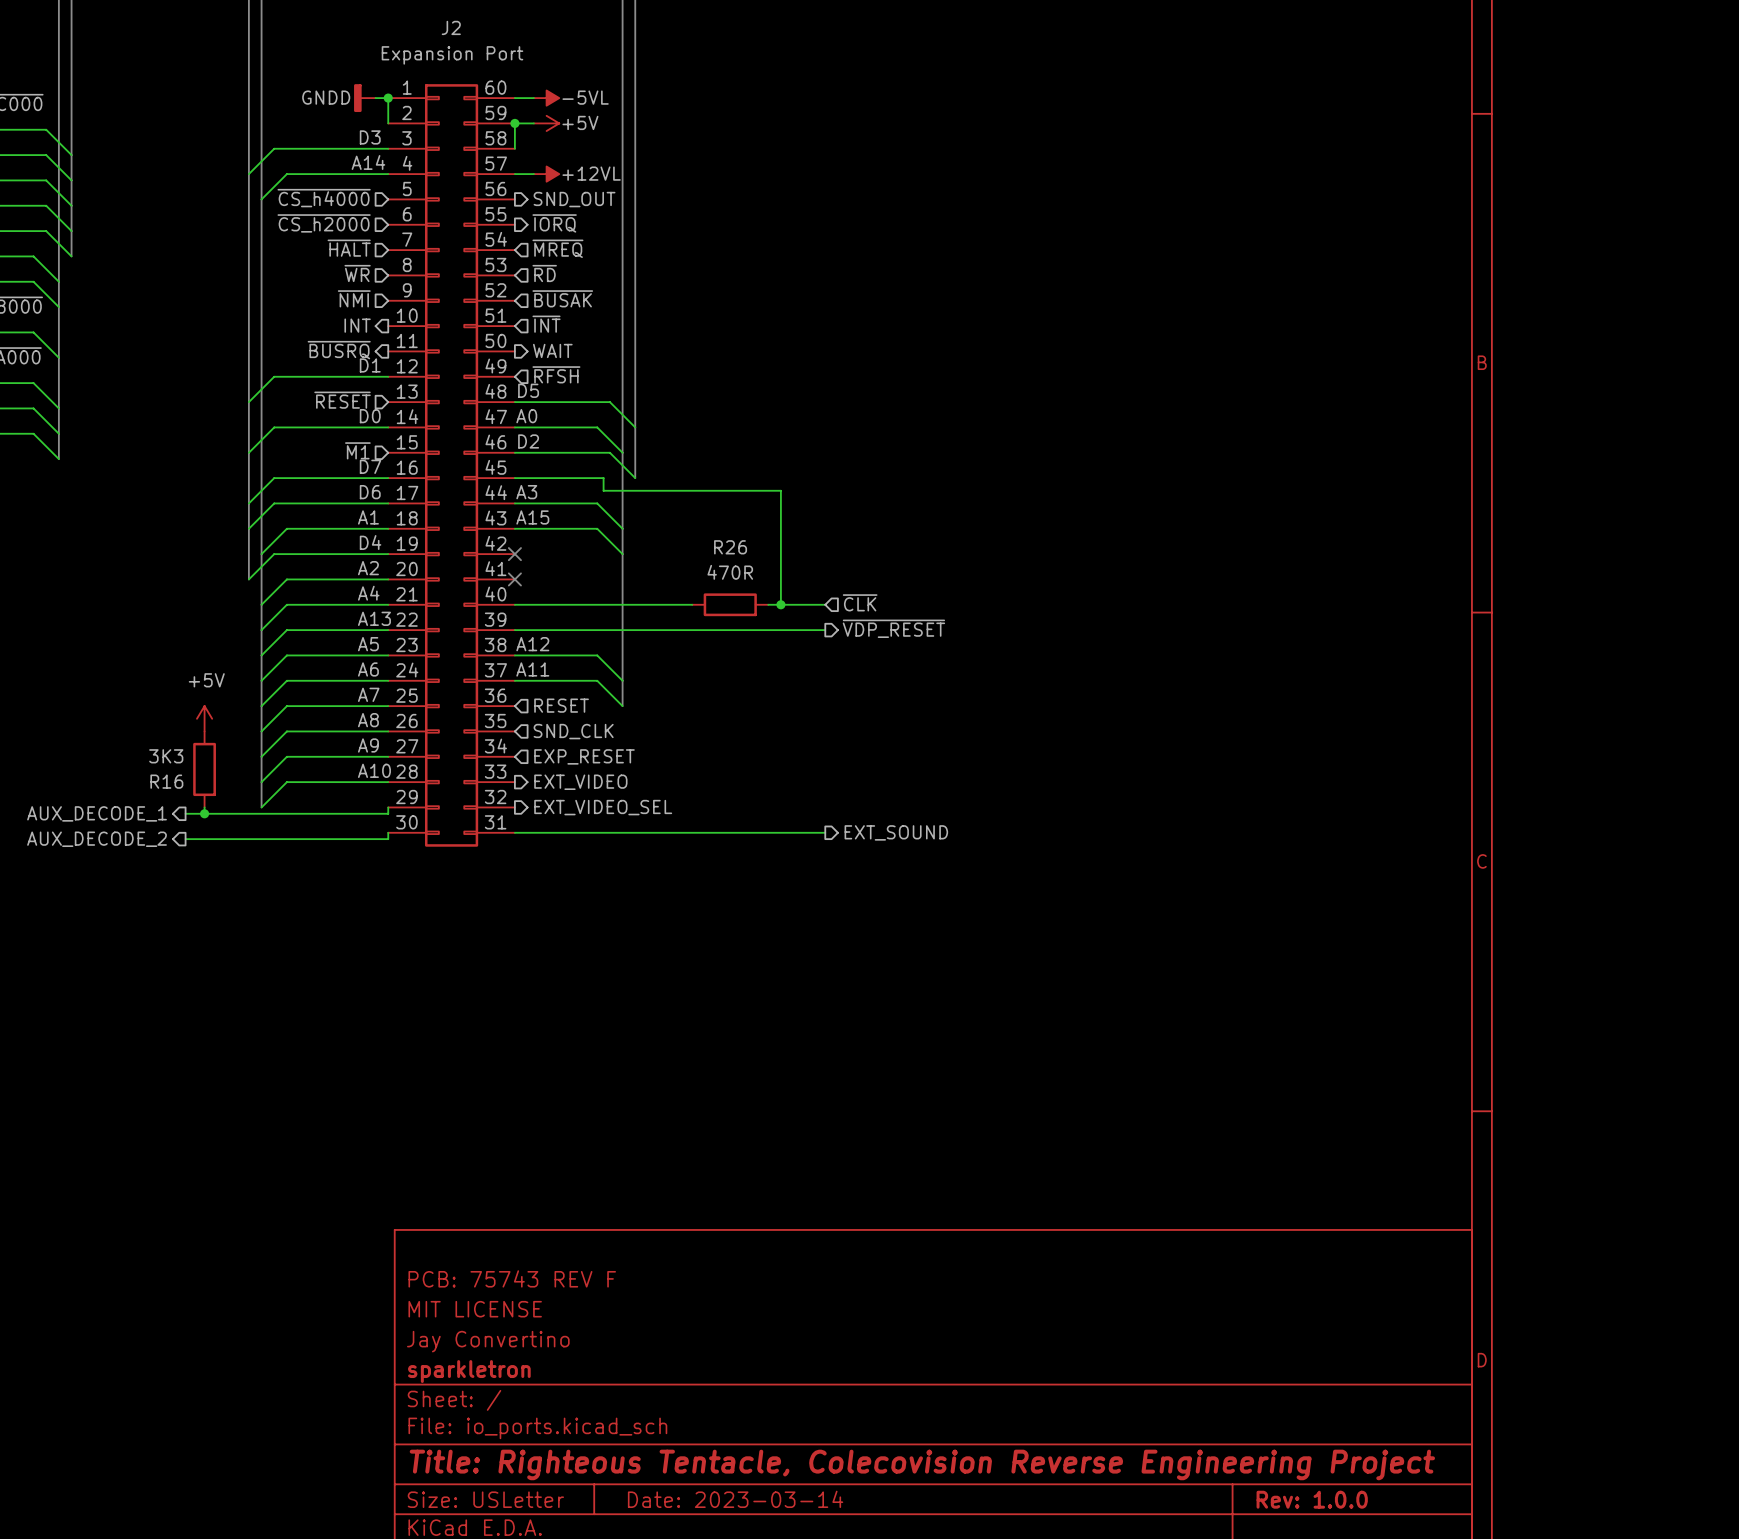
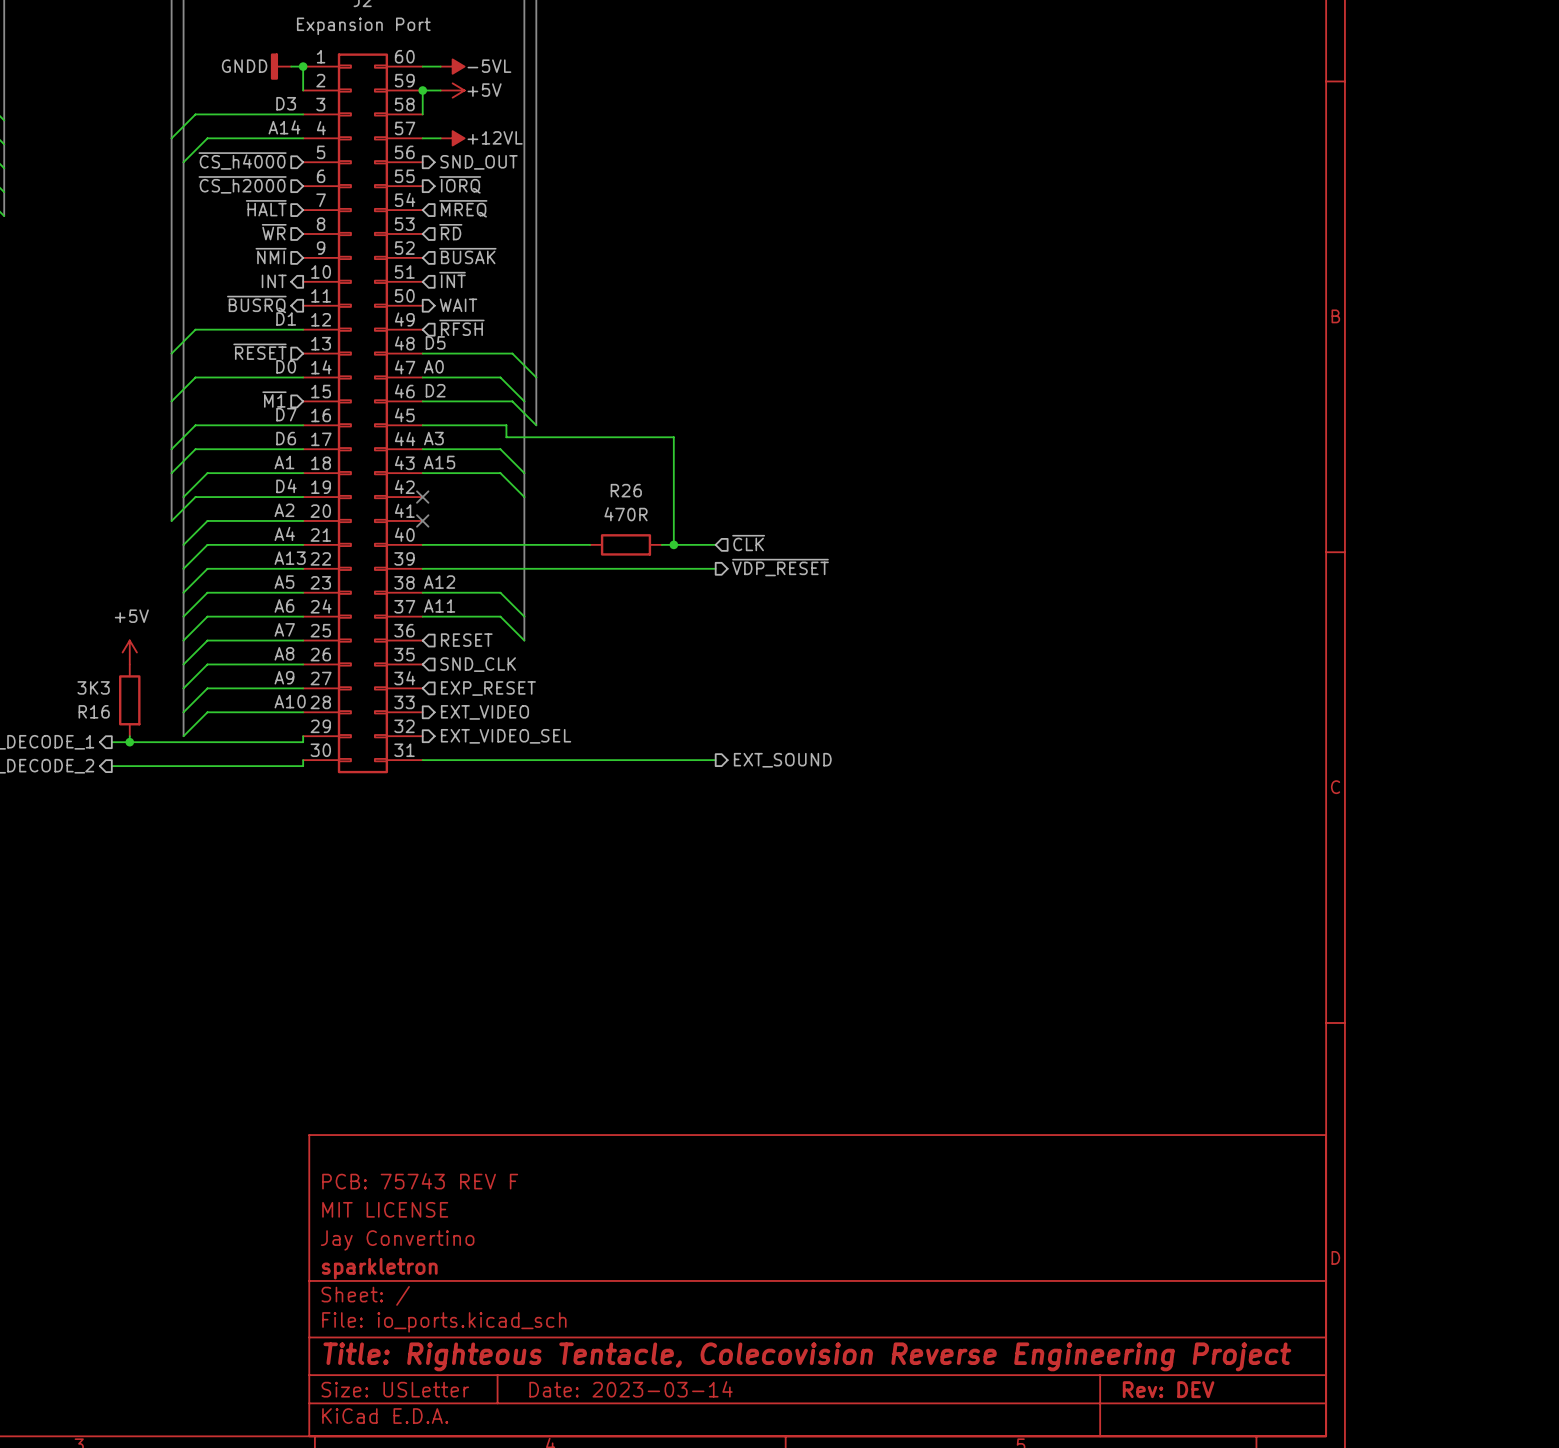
title block: Rev: 1.0.0 (1312, 1499) -> Rev: DEV (1168, 1389)

